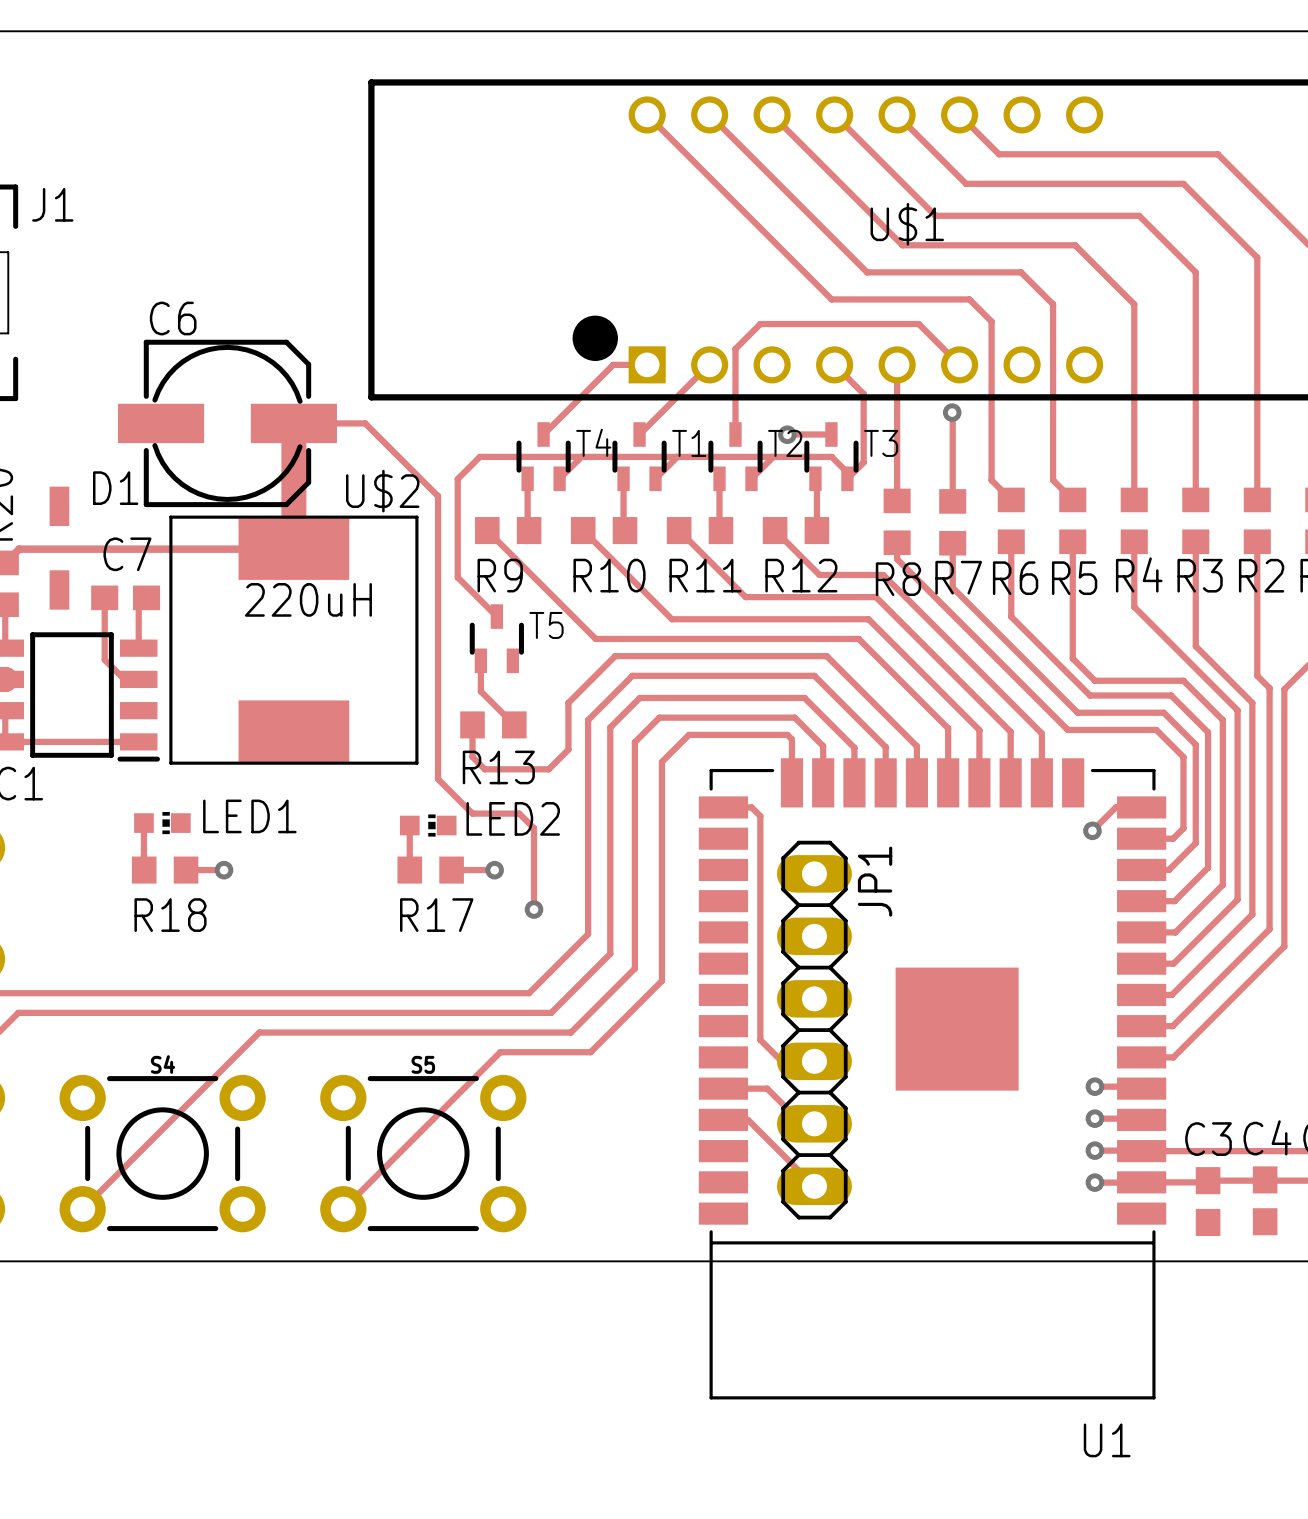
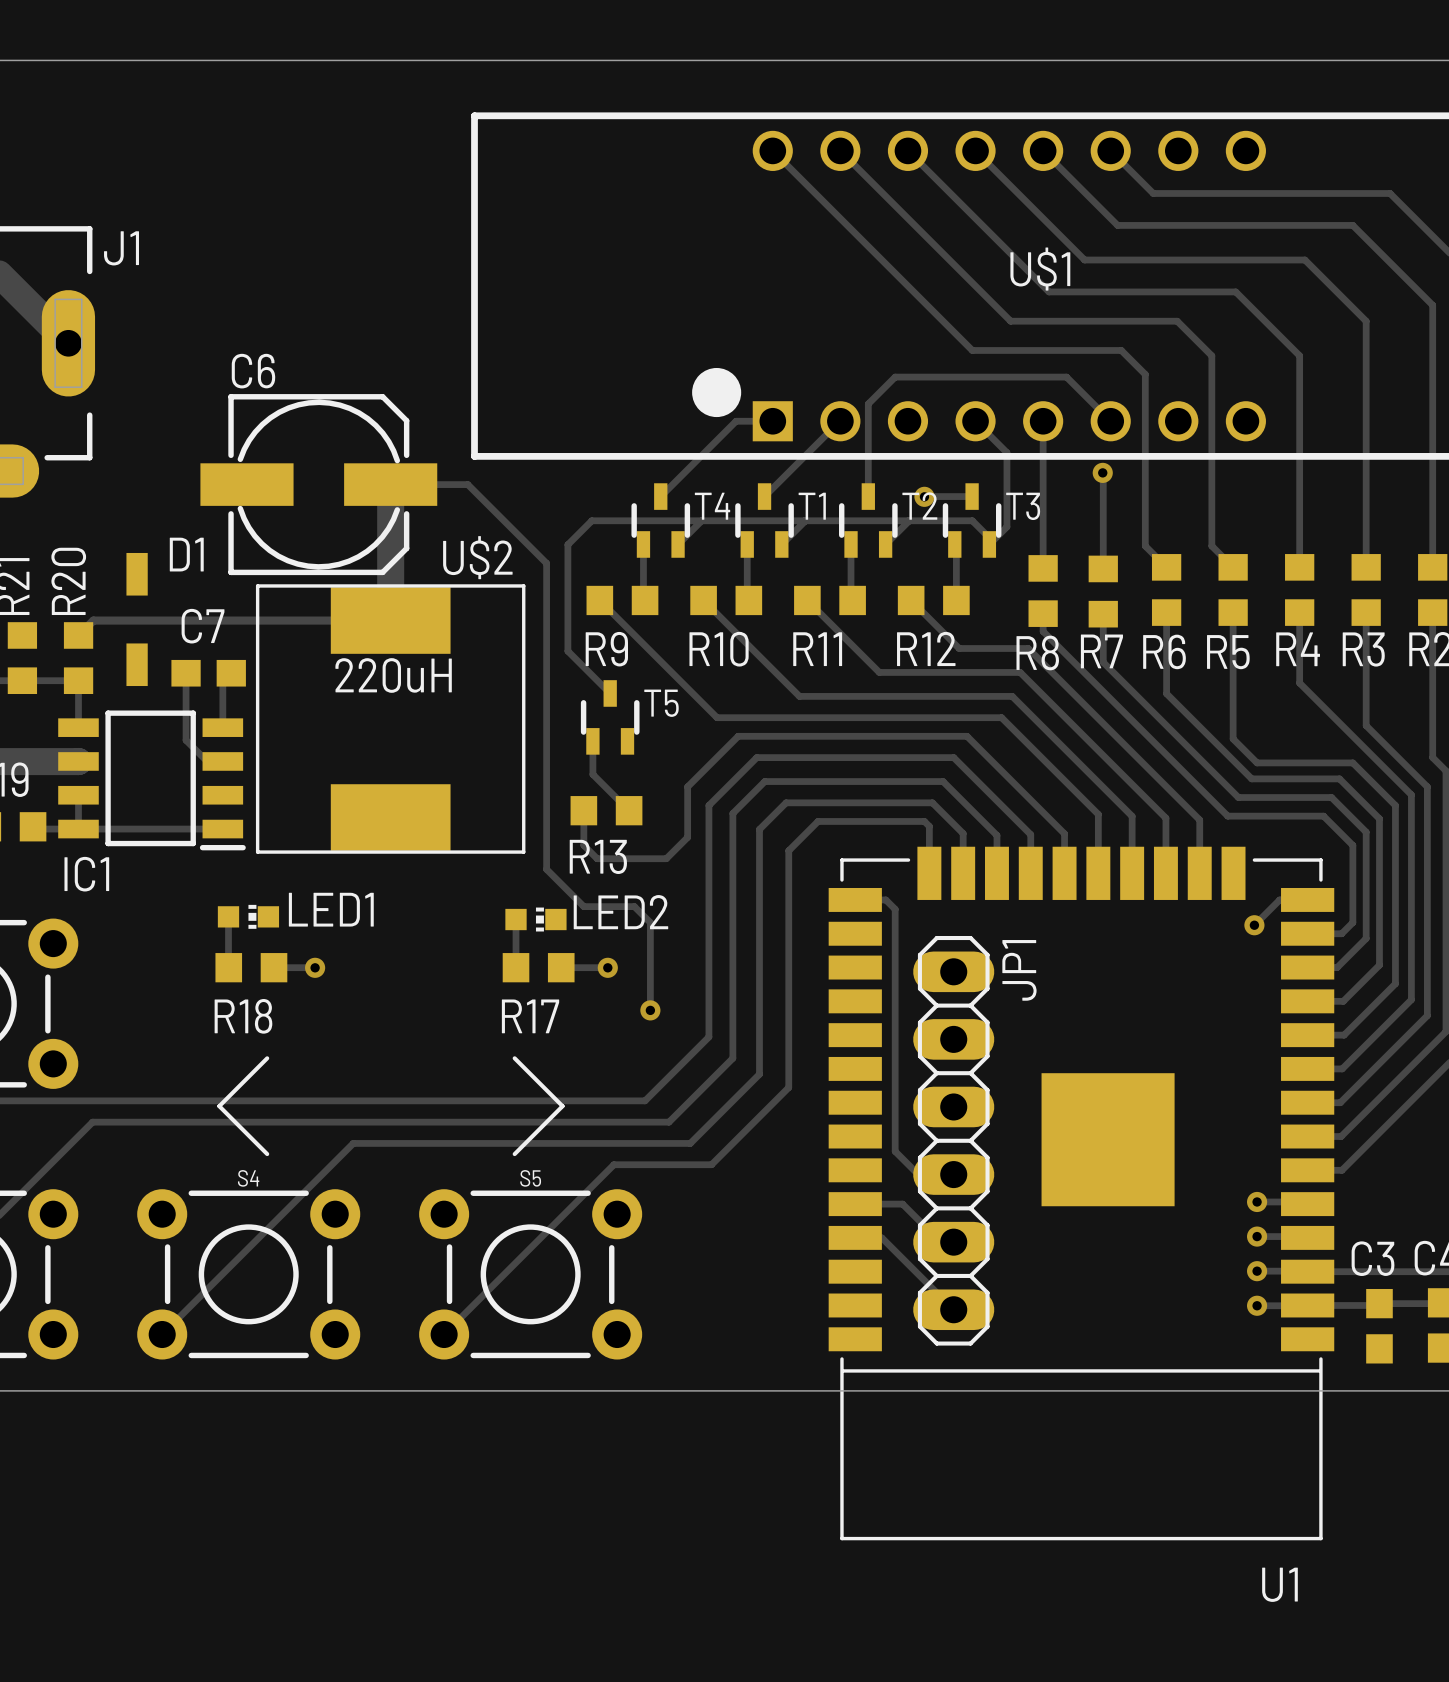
line: none -> (267, 1058) (219, 1106) (267, 1154)
line: none -> (514, 1058) (562, 1106) (514, 1154)

